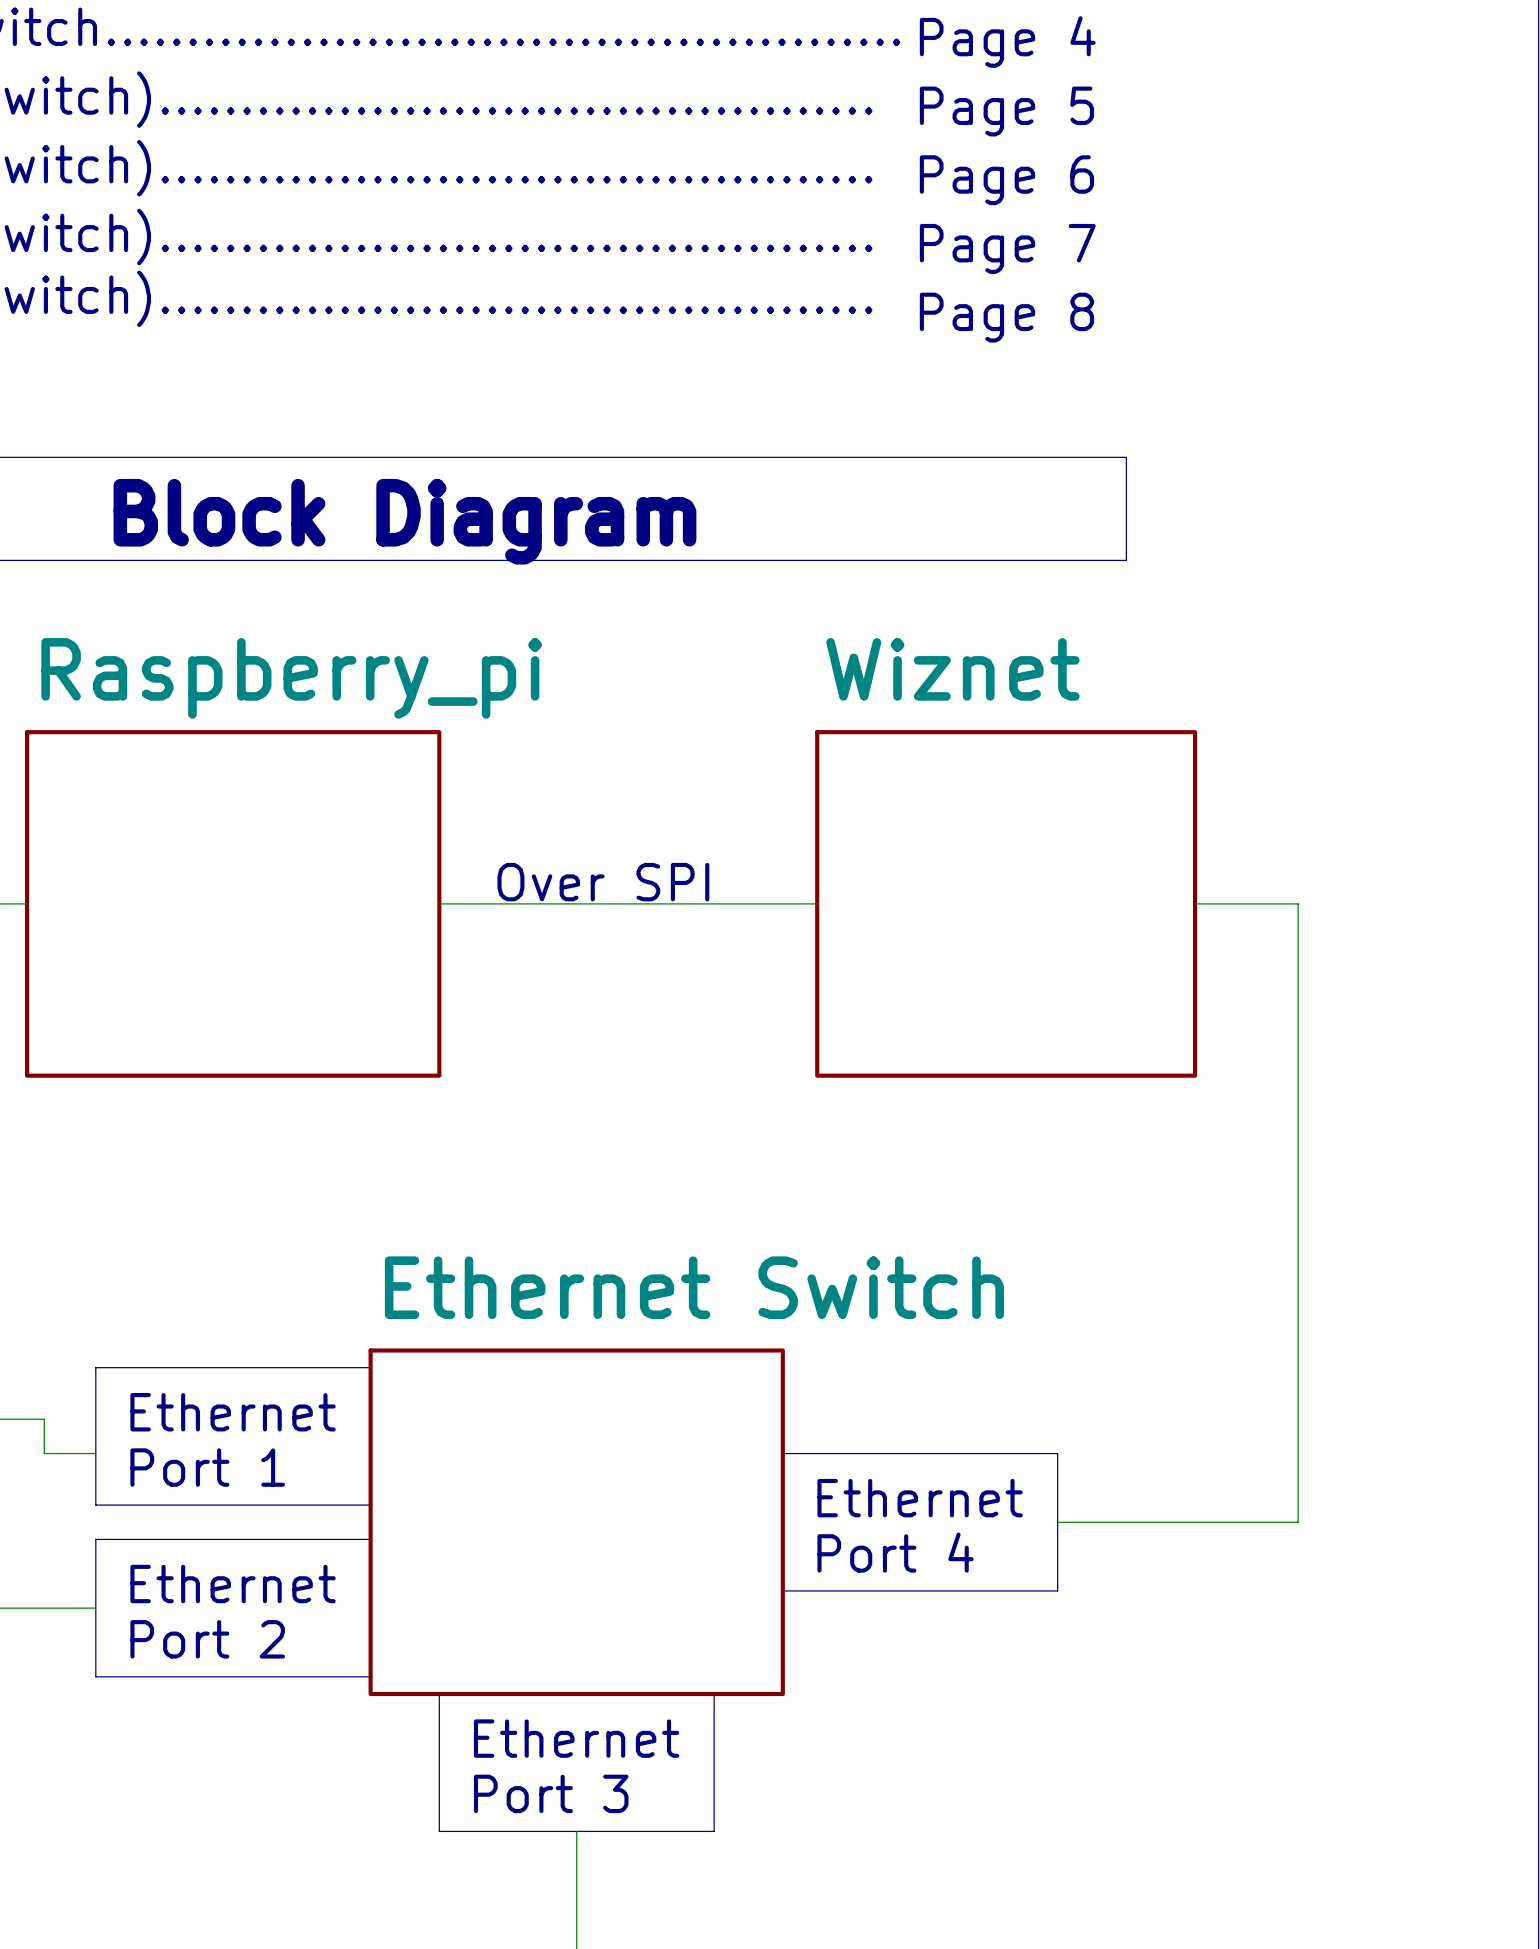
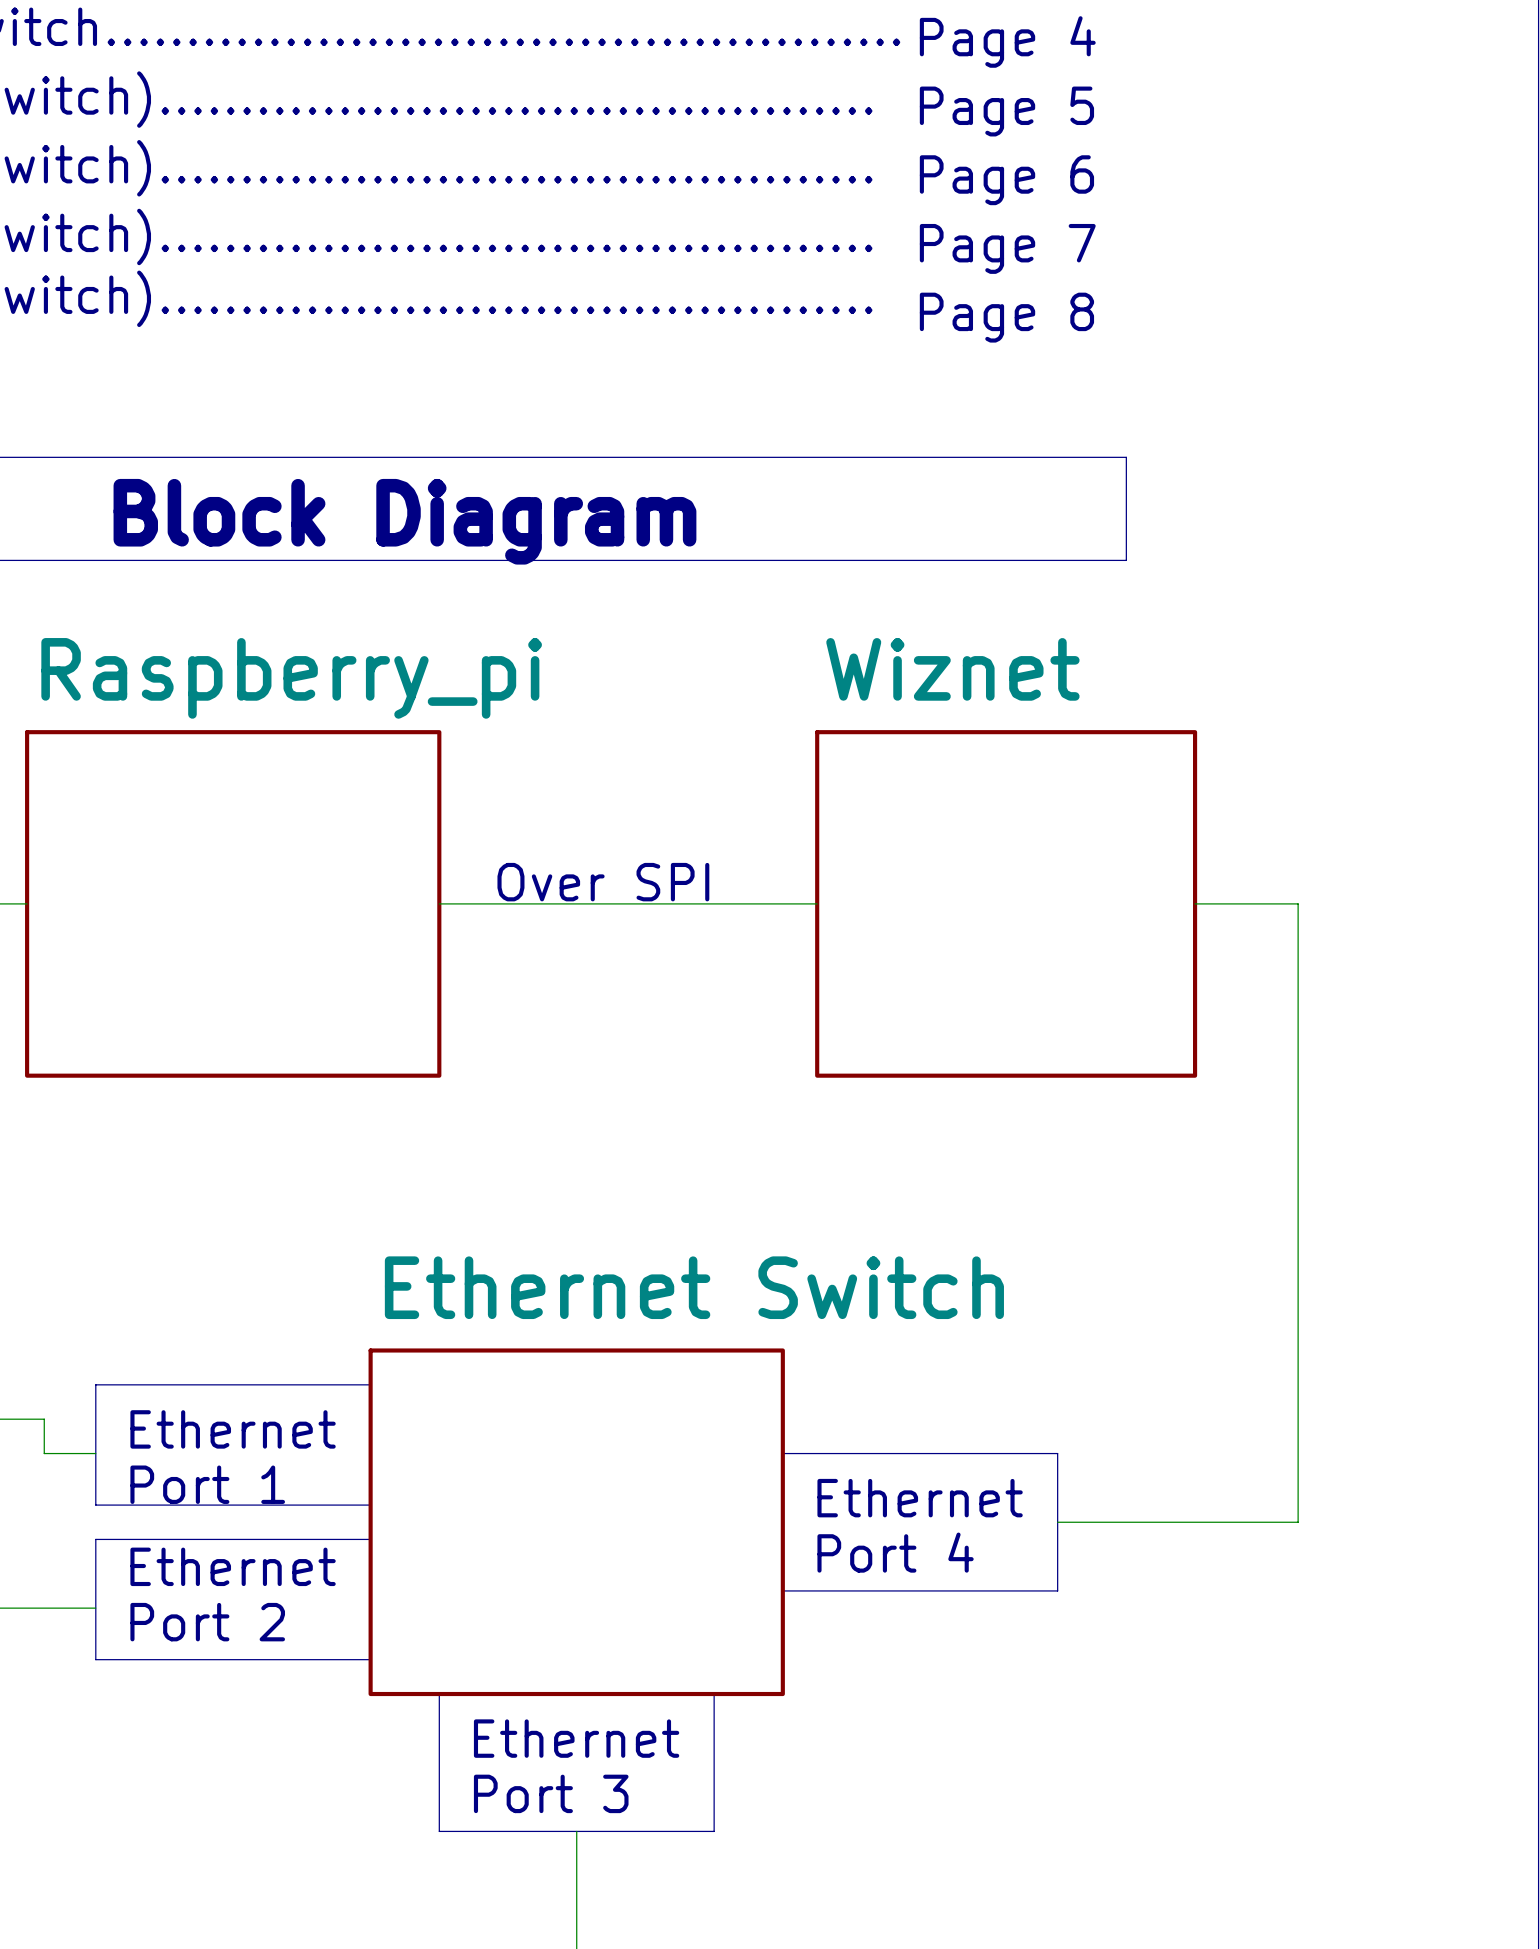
line: (95, 1384) (95, 1367) (370, 1367) (370, 1384) -> (95, 1384) (370, 1384)
text position: Ethernet (233, 1412) -> Ethernet (233, 1429)
text position: Port 1 (207, 1467) -> Port 1 (207, 1484)
text position: Ethernet (233, 1584) -> Ethernet (233, 1566)
text position: Port 2 (207, 1639) -> Port 2 (207, 1622)
line: (95, 1659) (95, 1676) (370, 1676) (370, 1659) -> (95, 1659) (370, 1659)

